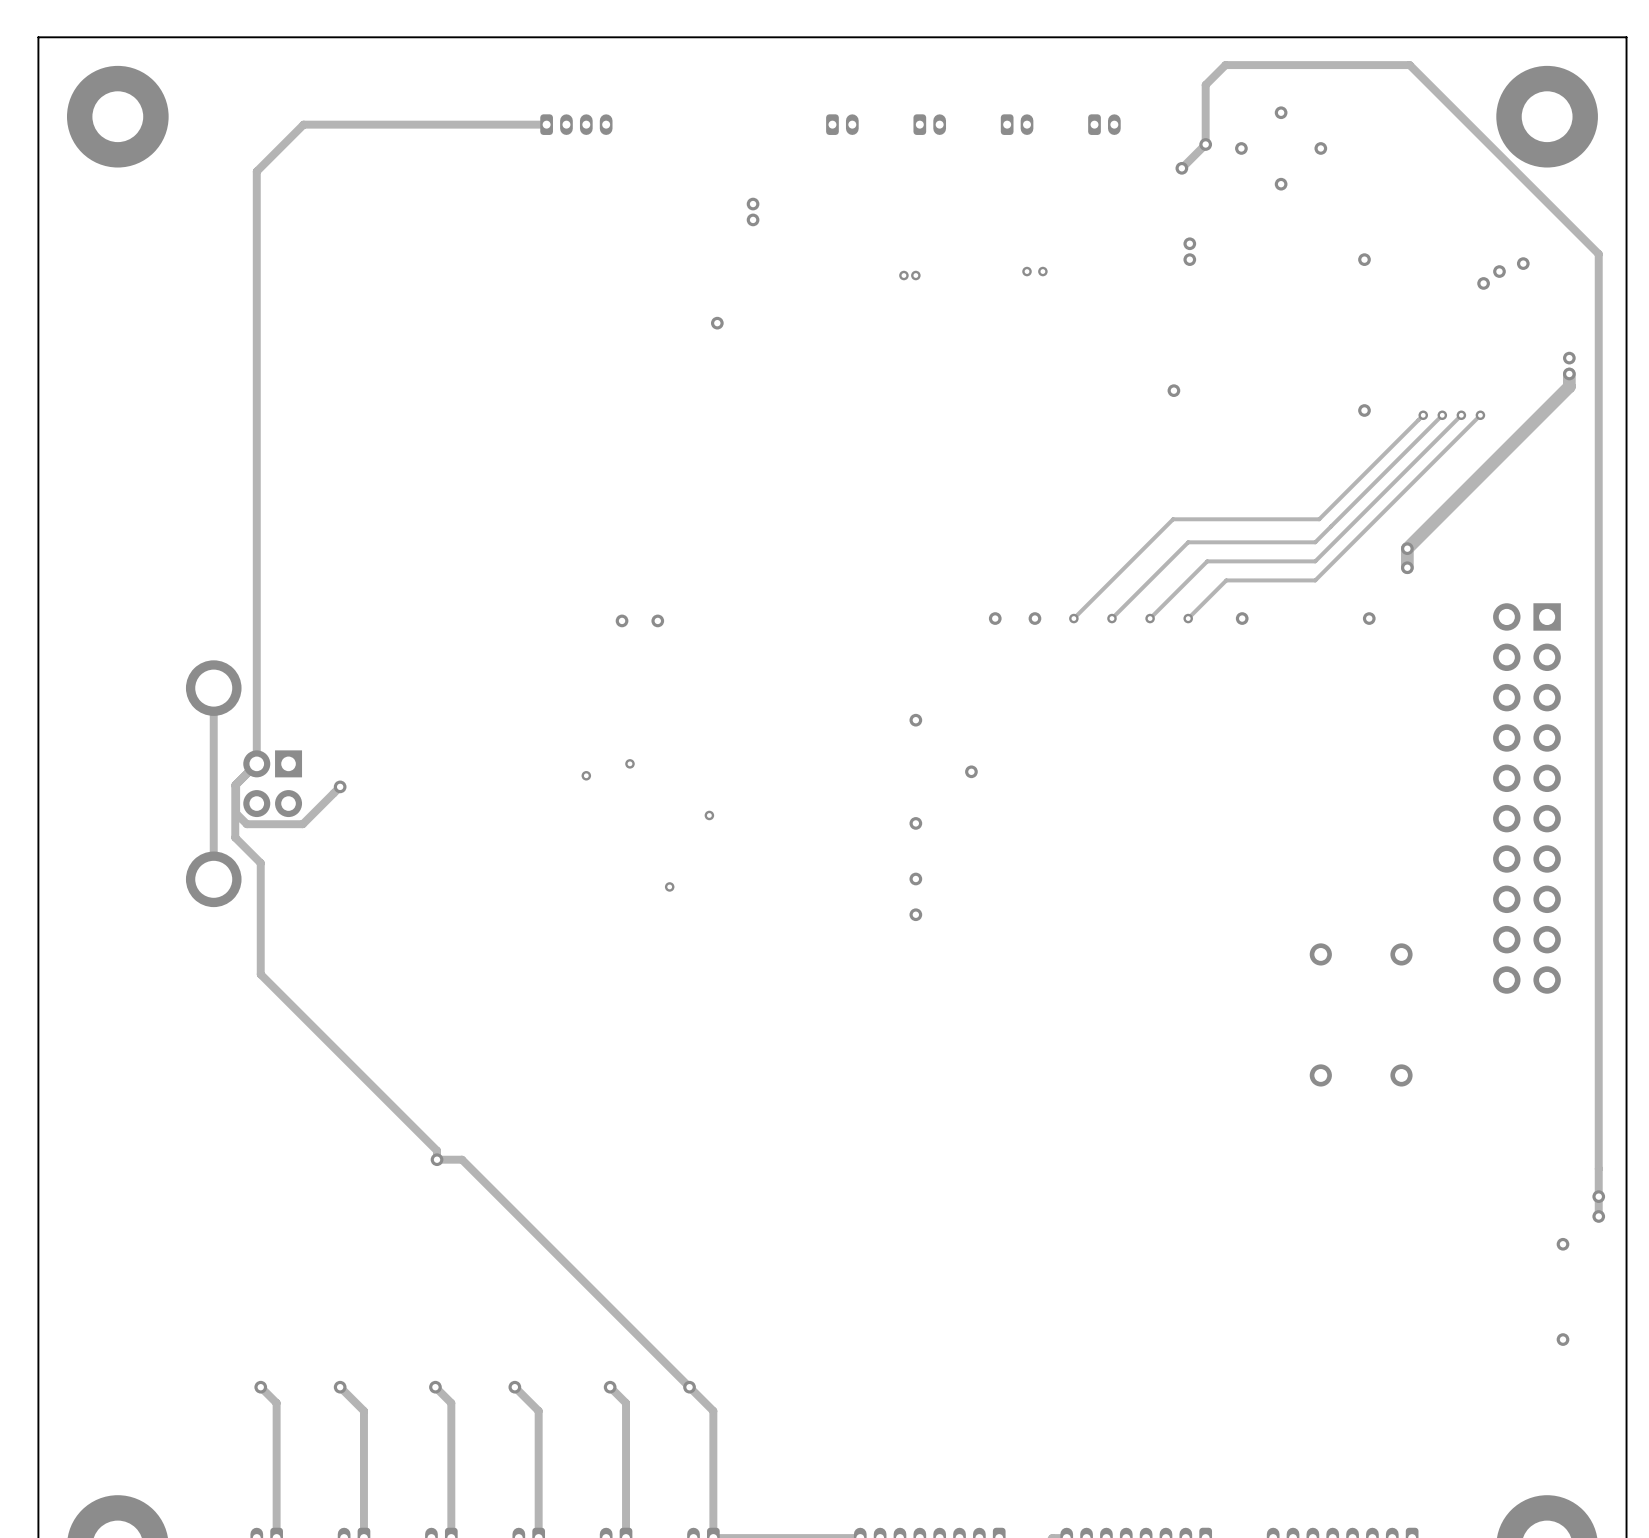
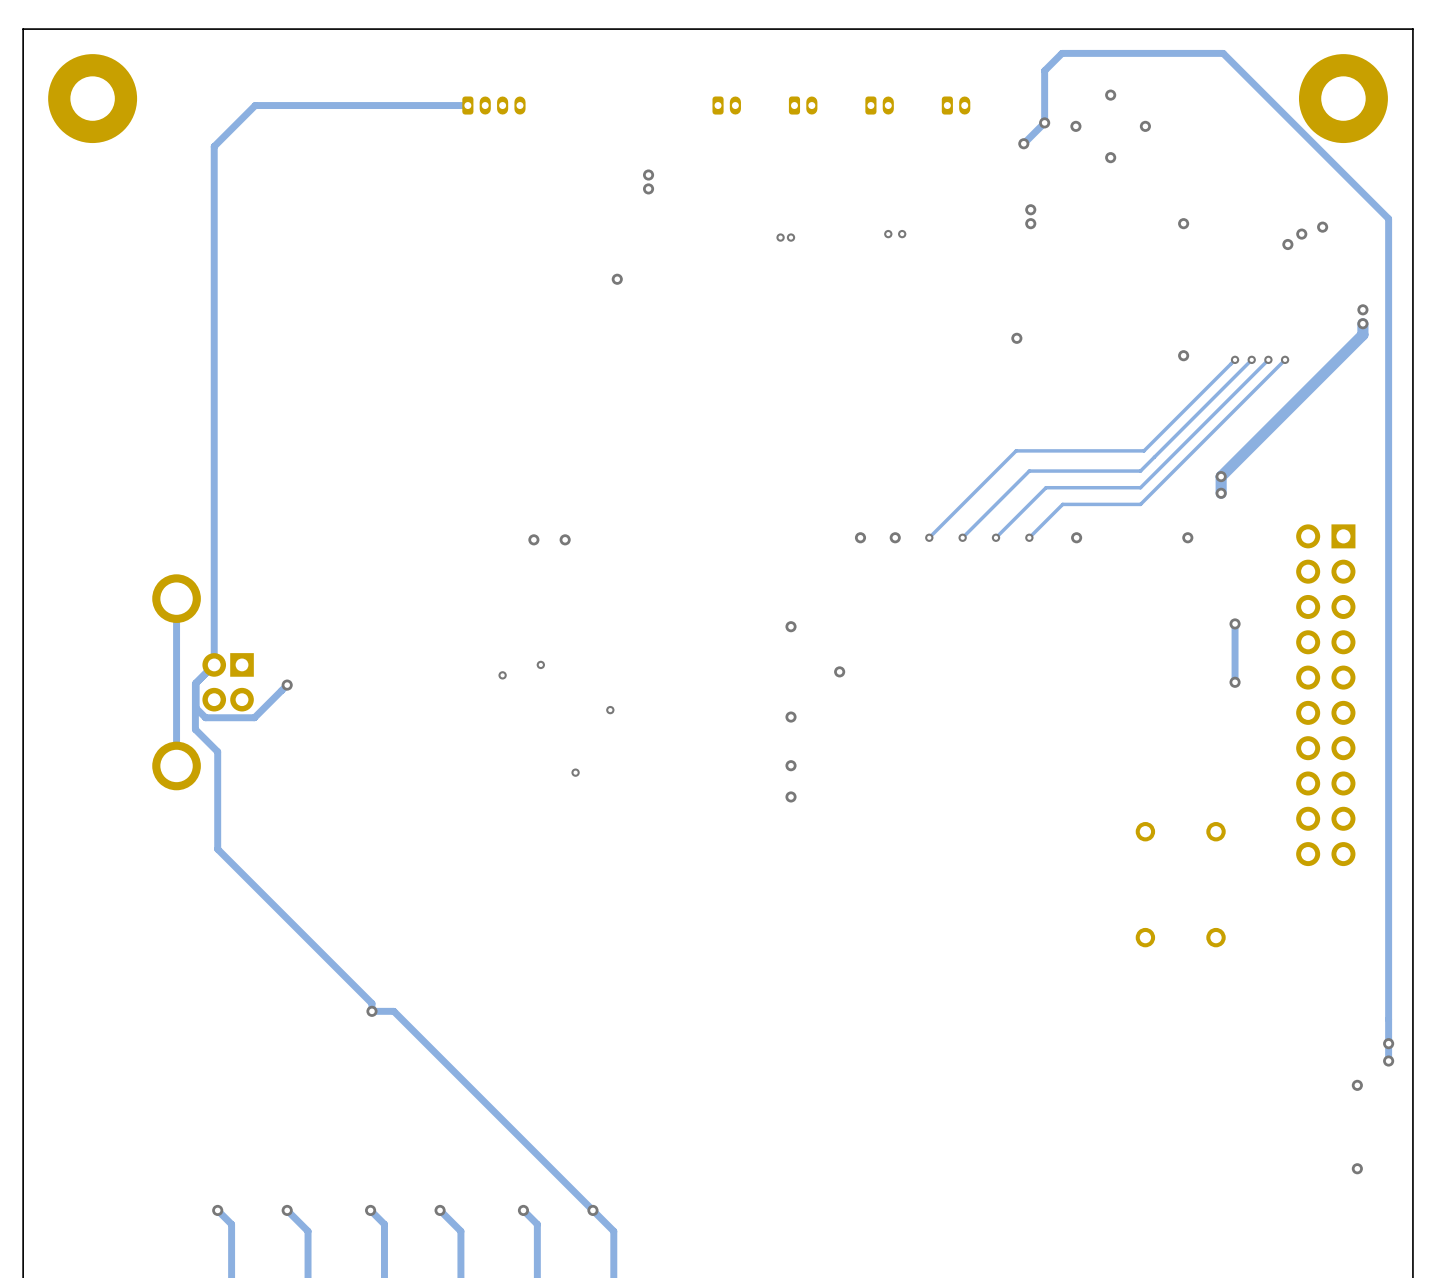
track: none -> (1235, 623) (1235, 682)
via: none -> (1235, 623)
via: none -> (1235, 682)

